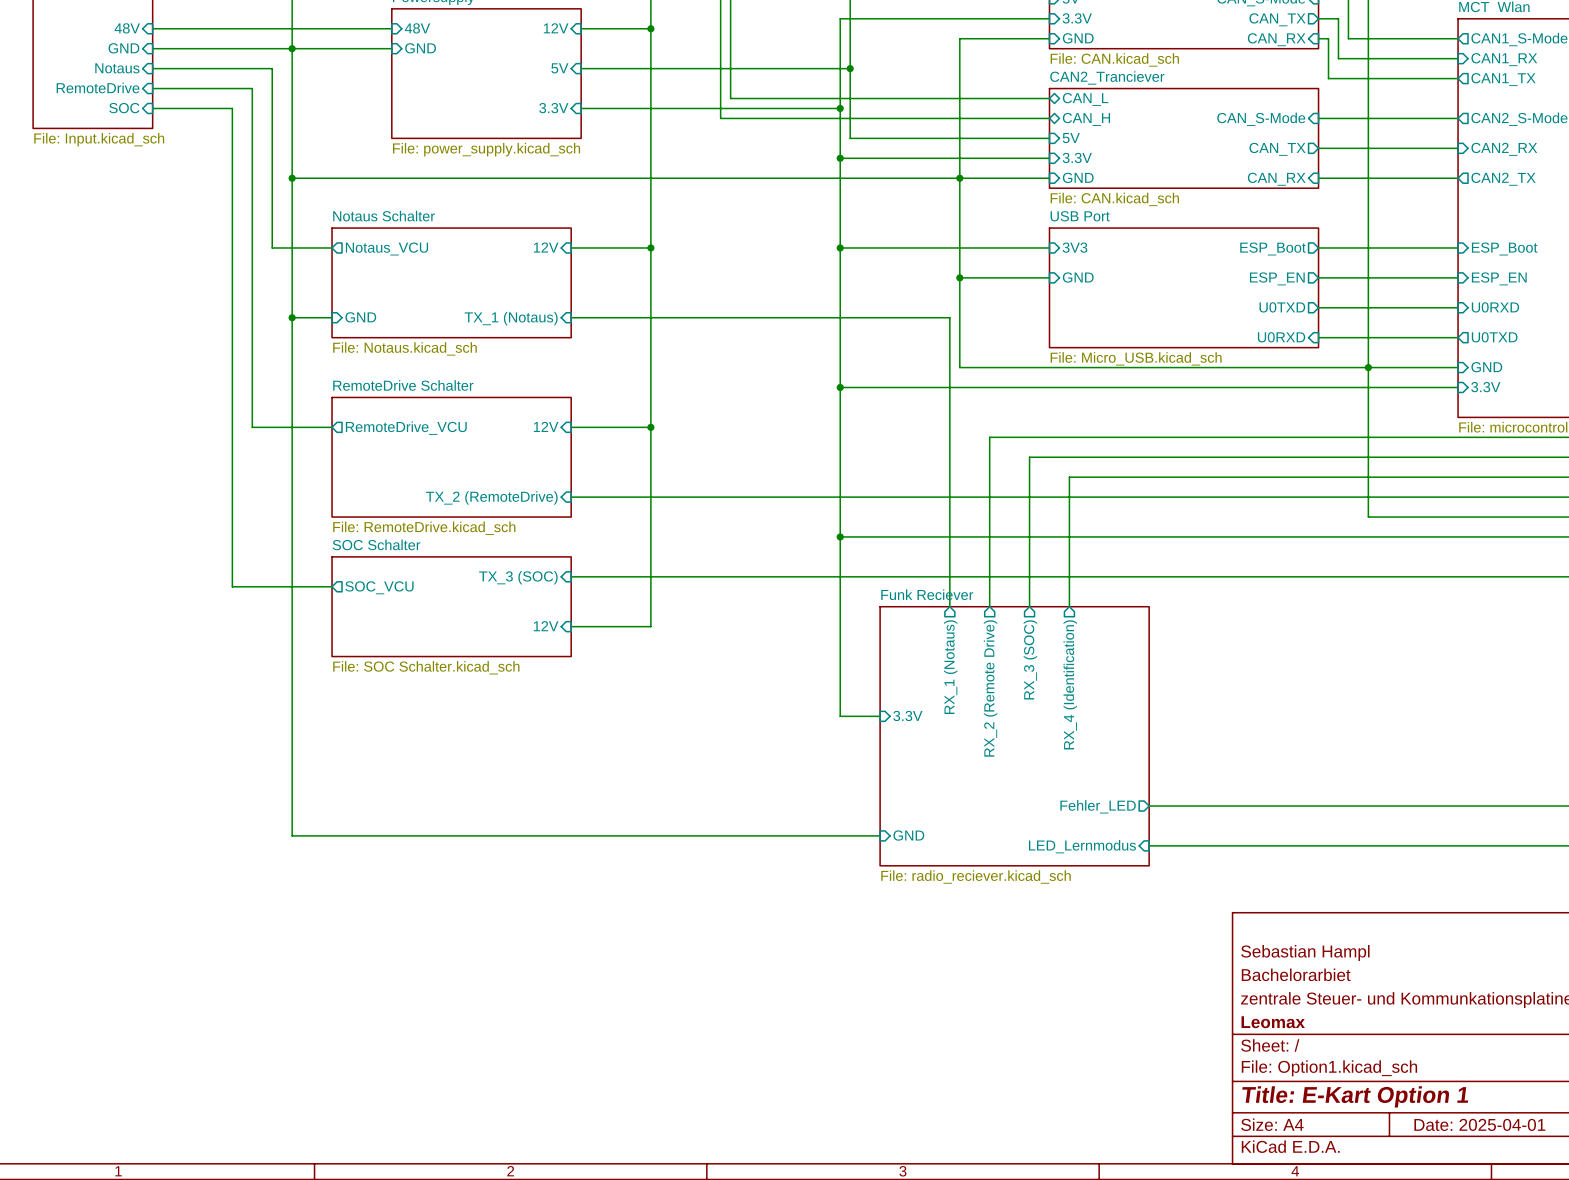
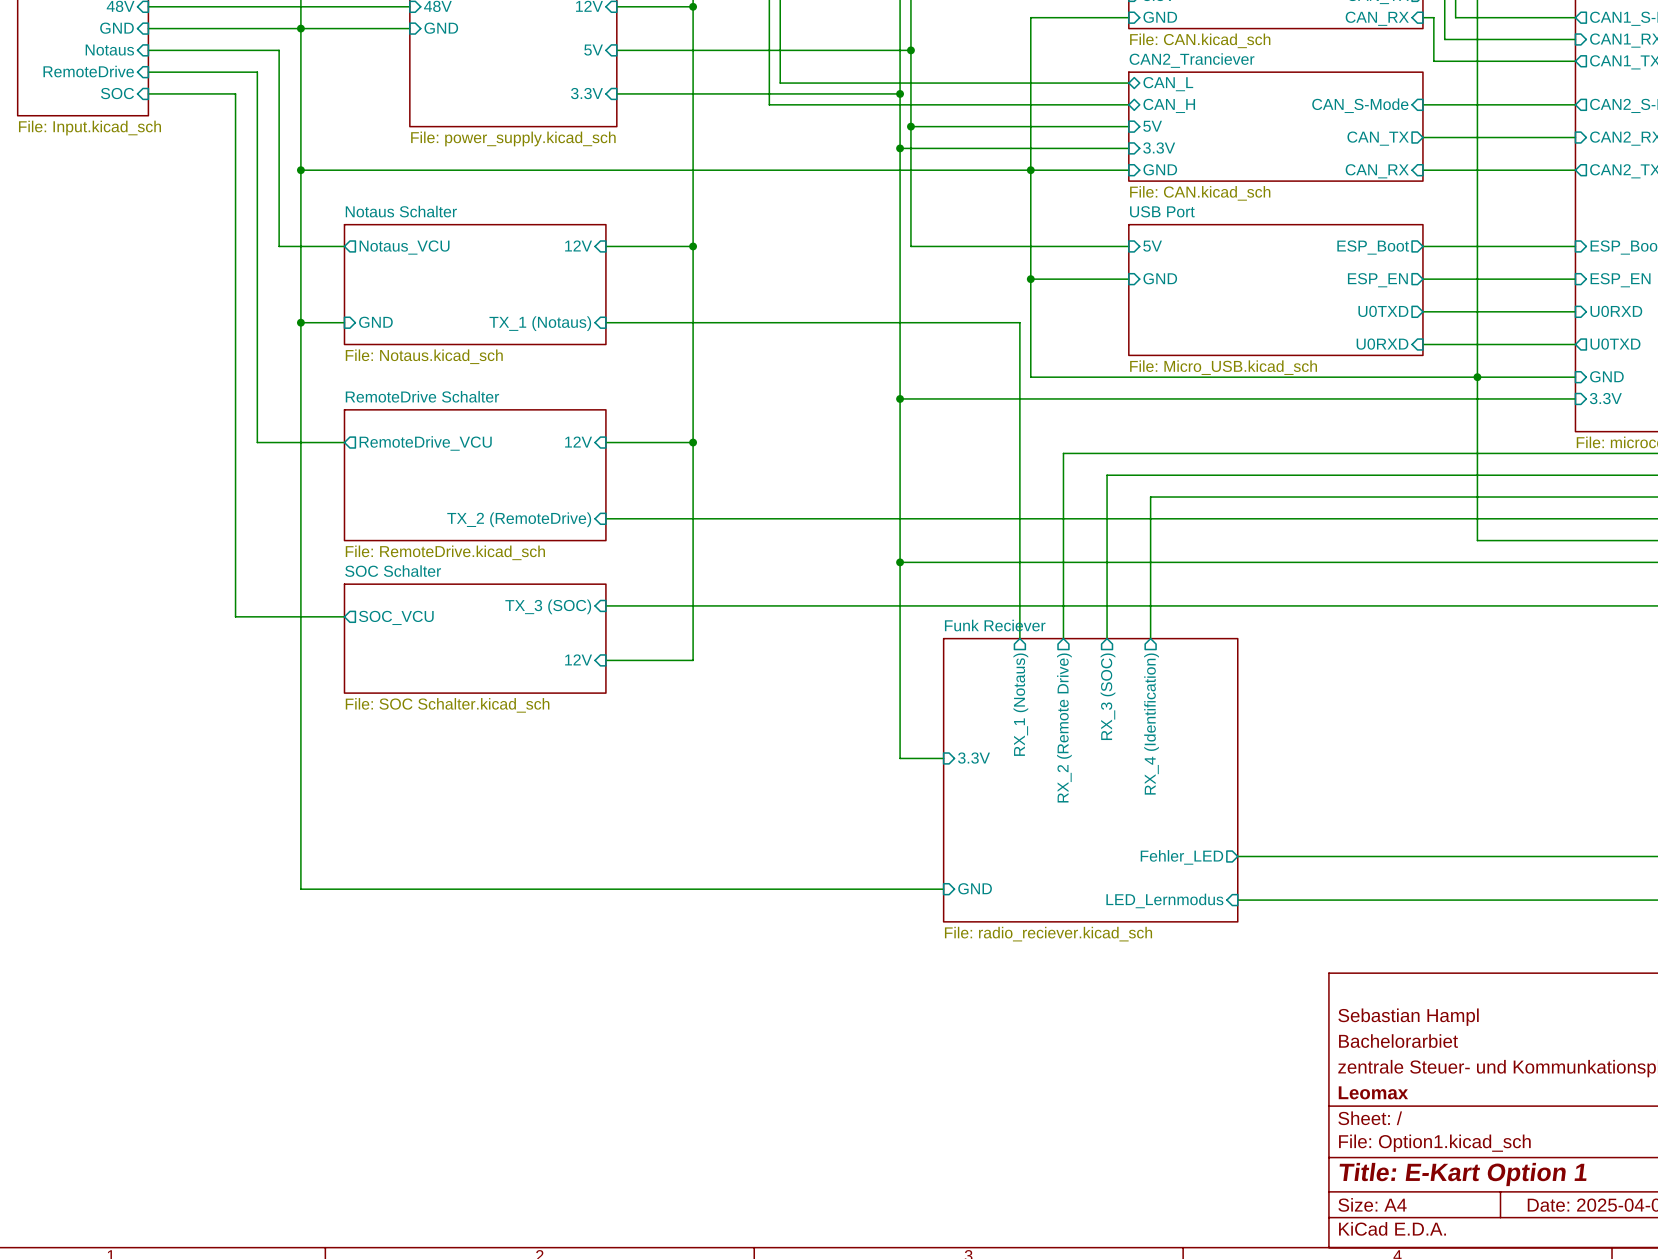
junction: none -> (910, 126)
wire: (840, 247) (850, 247) -> (910, 126) (910, 246)
junction: (840, 247) -> none
sheet pin: 3V3 (1074, 247) -> 5V (1152, 246)

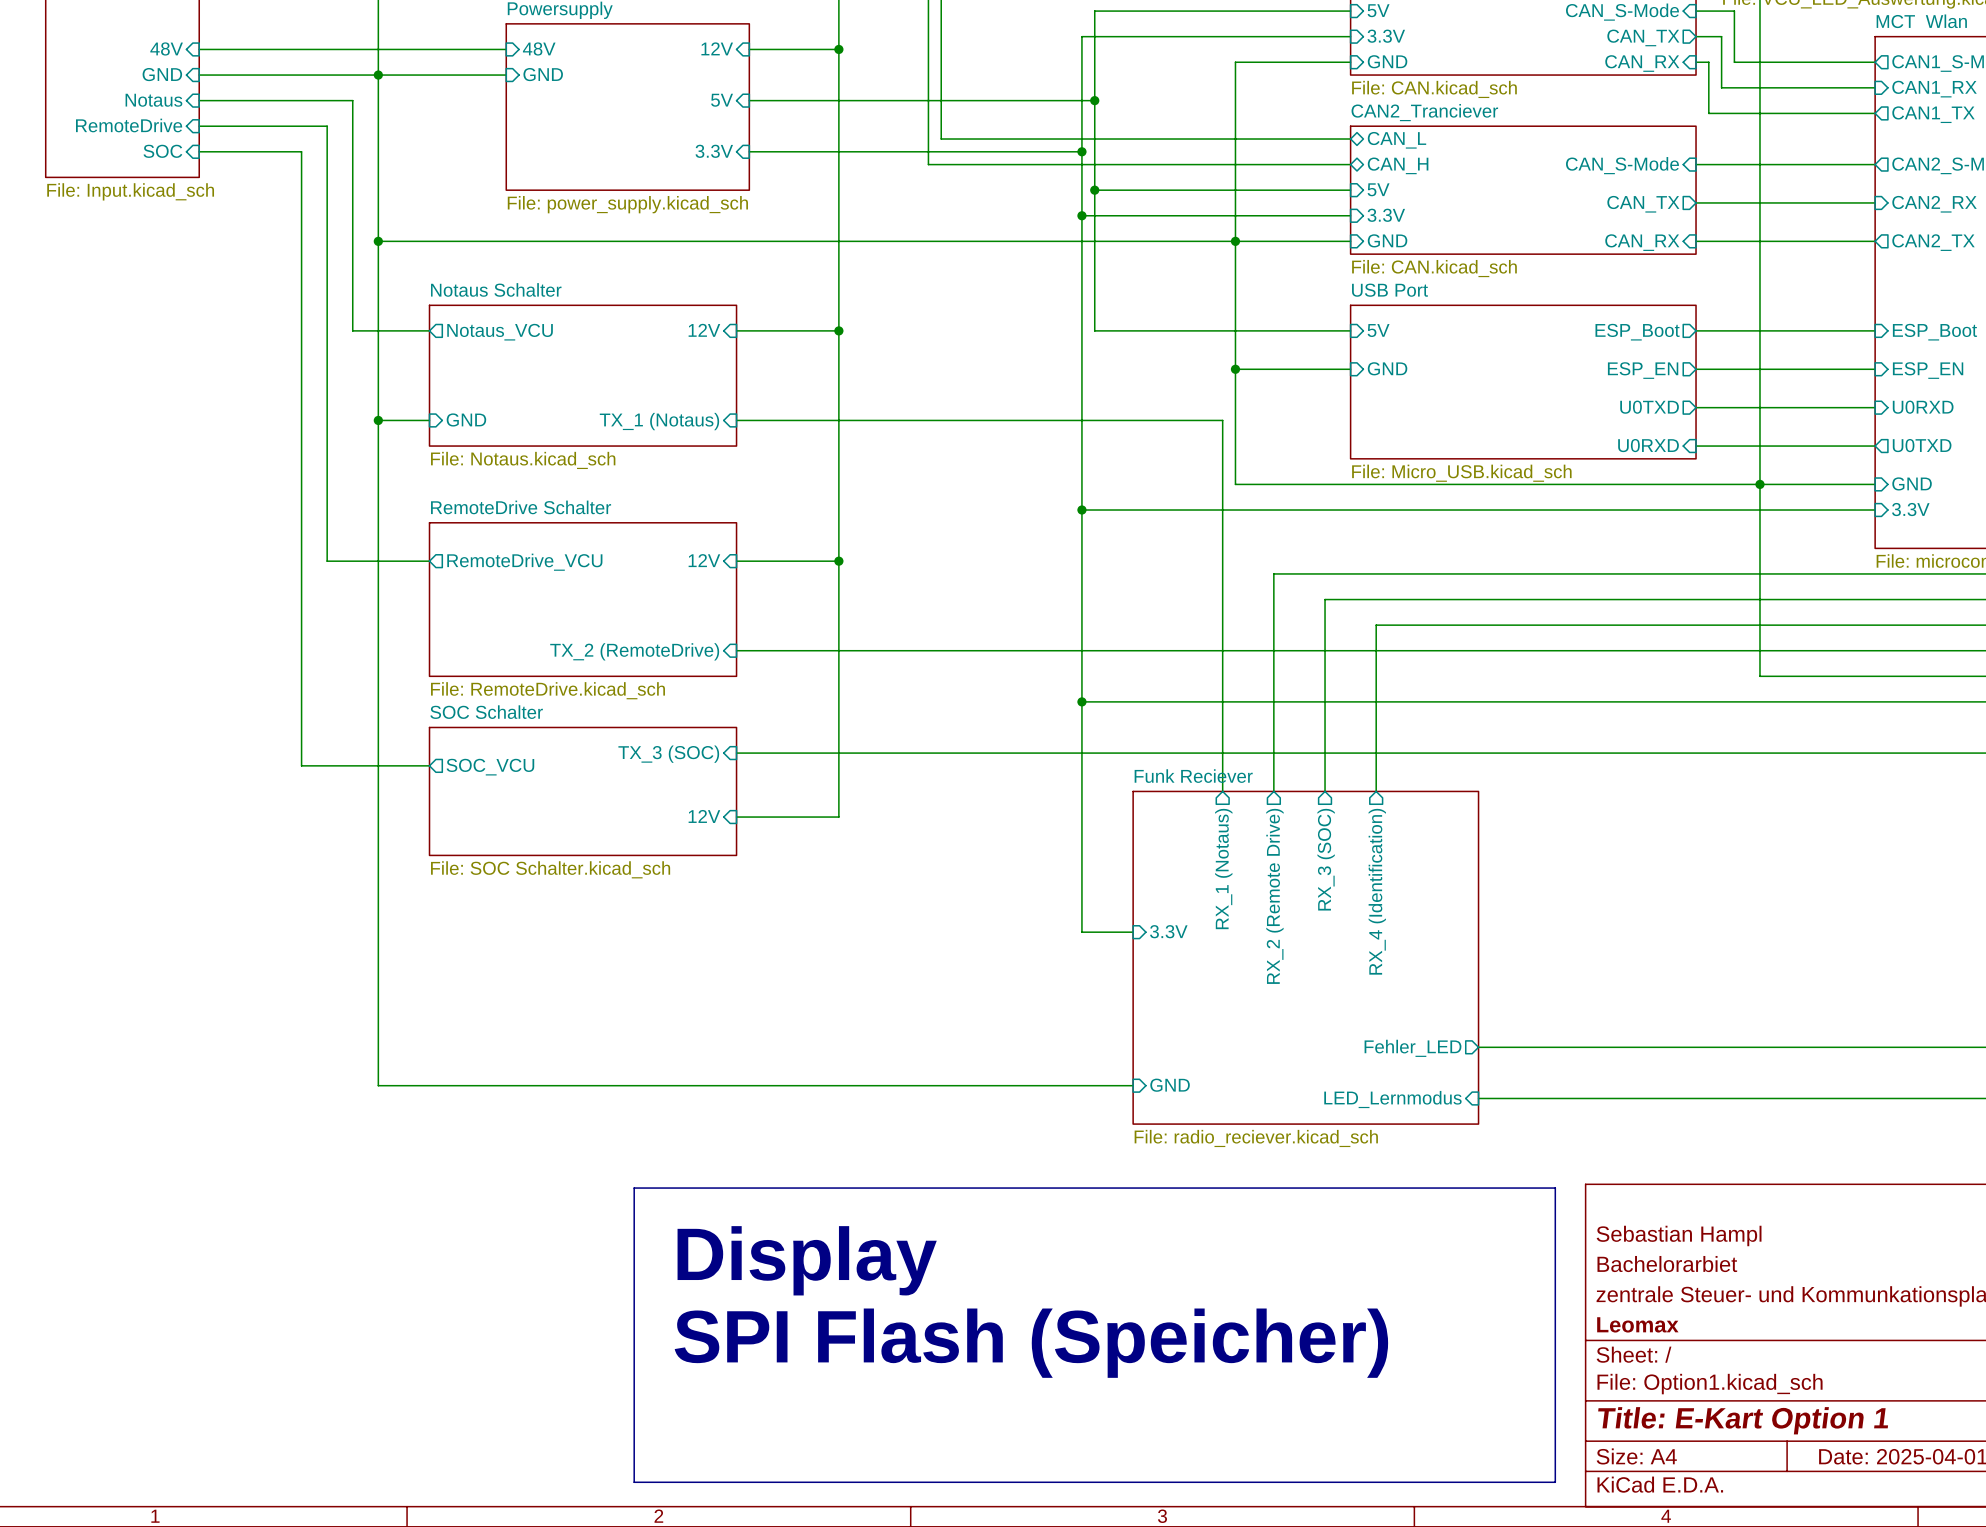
line: none -> (634, 1188) (1555, 1188) (1555, 1482) (634, 1482) (634, 1188)
text: none -> Display (807, 1260)
text: none -> SPI Flash (Speicher) (1031, 1343)

